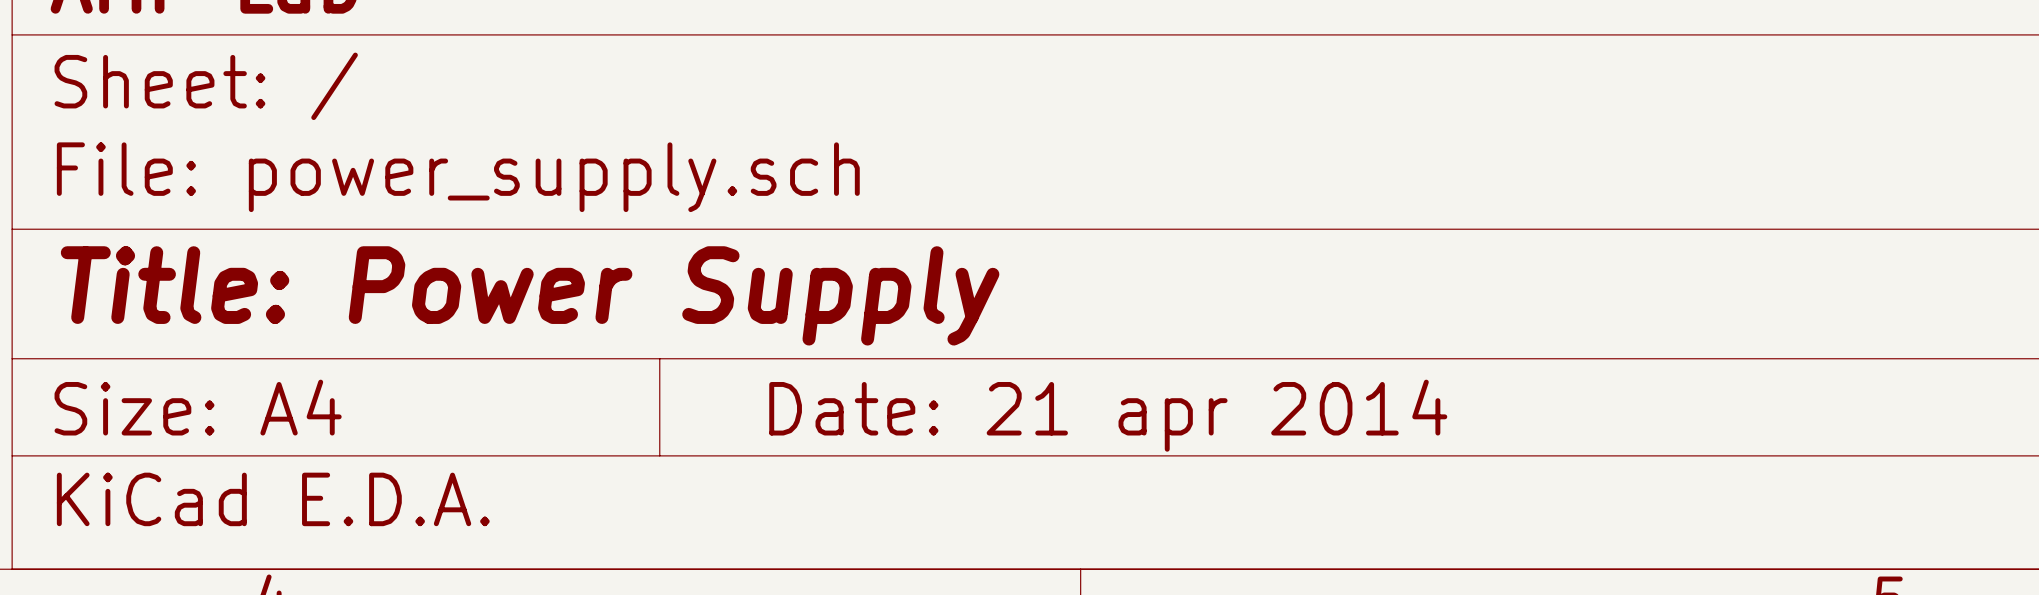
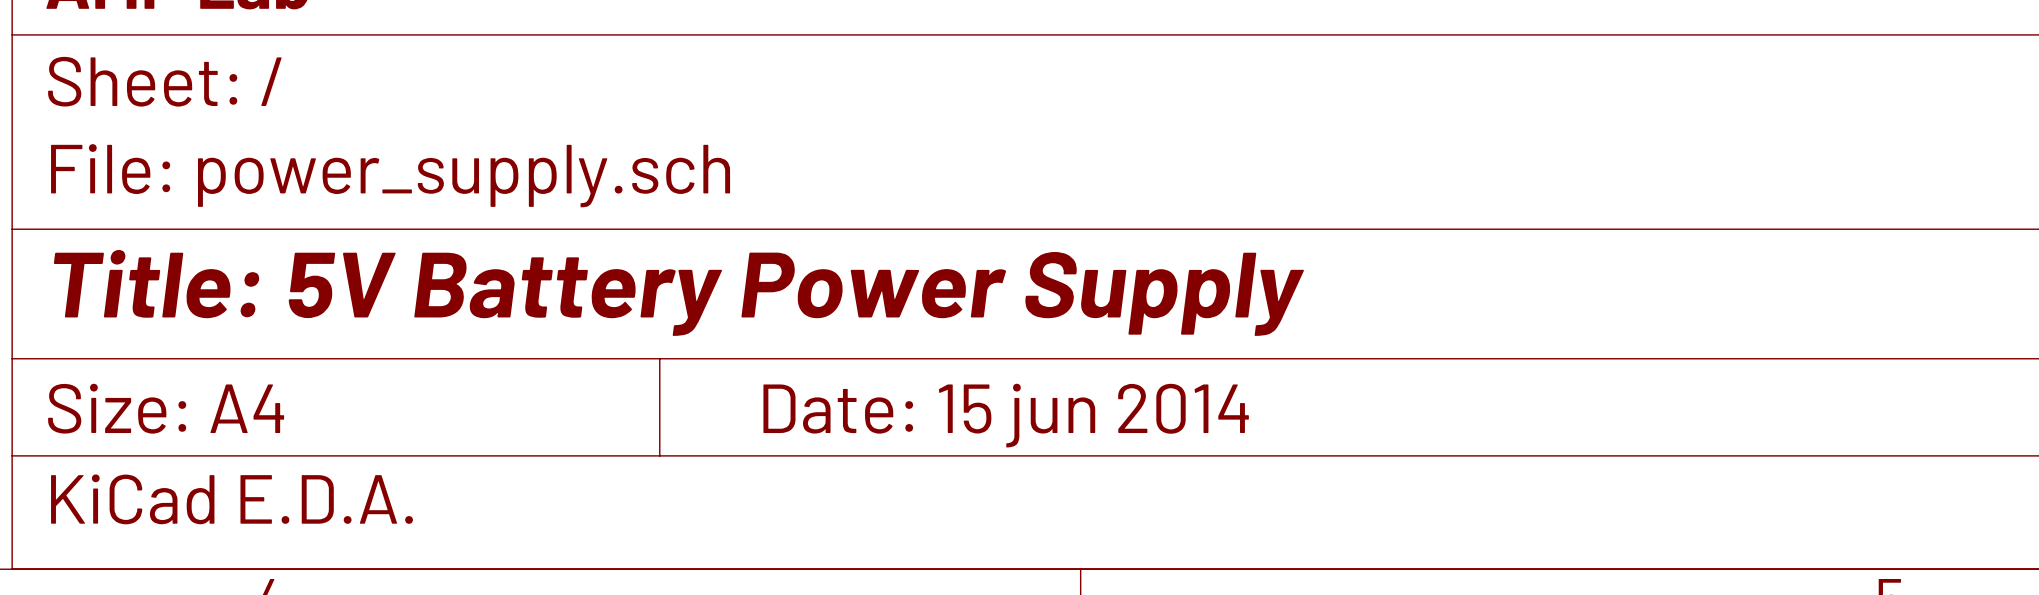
title block: Title: Power Supply (530, 295) -> Title: 5V Battery Power Supply (678, 292)
title block: Date: 21 apr 2014 (1108, 415) -> Date: 15 jun 2014 (1006, 415)

